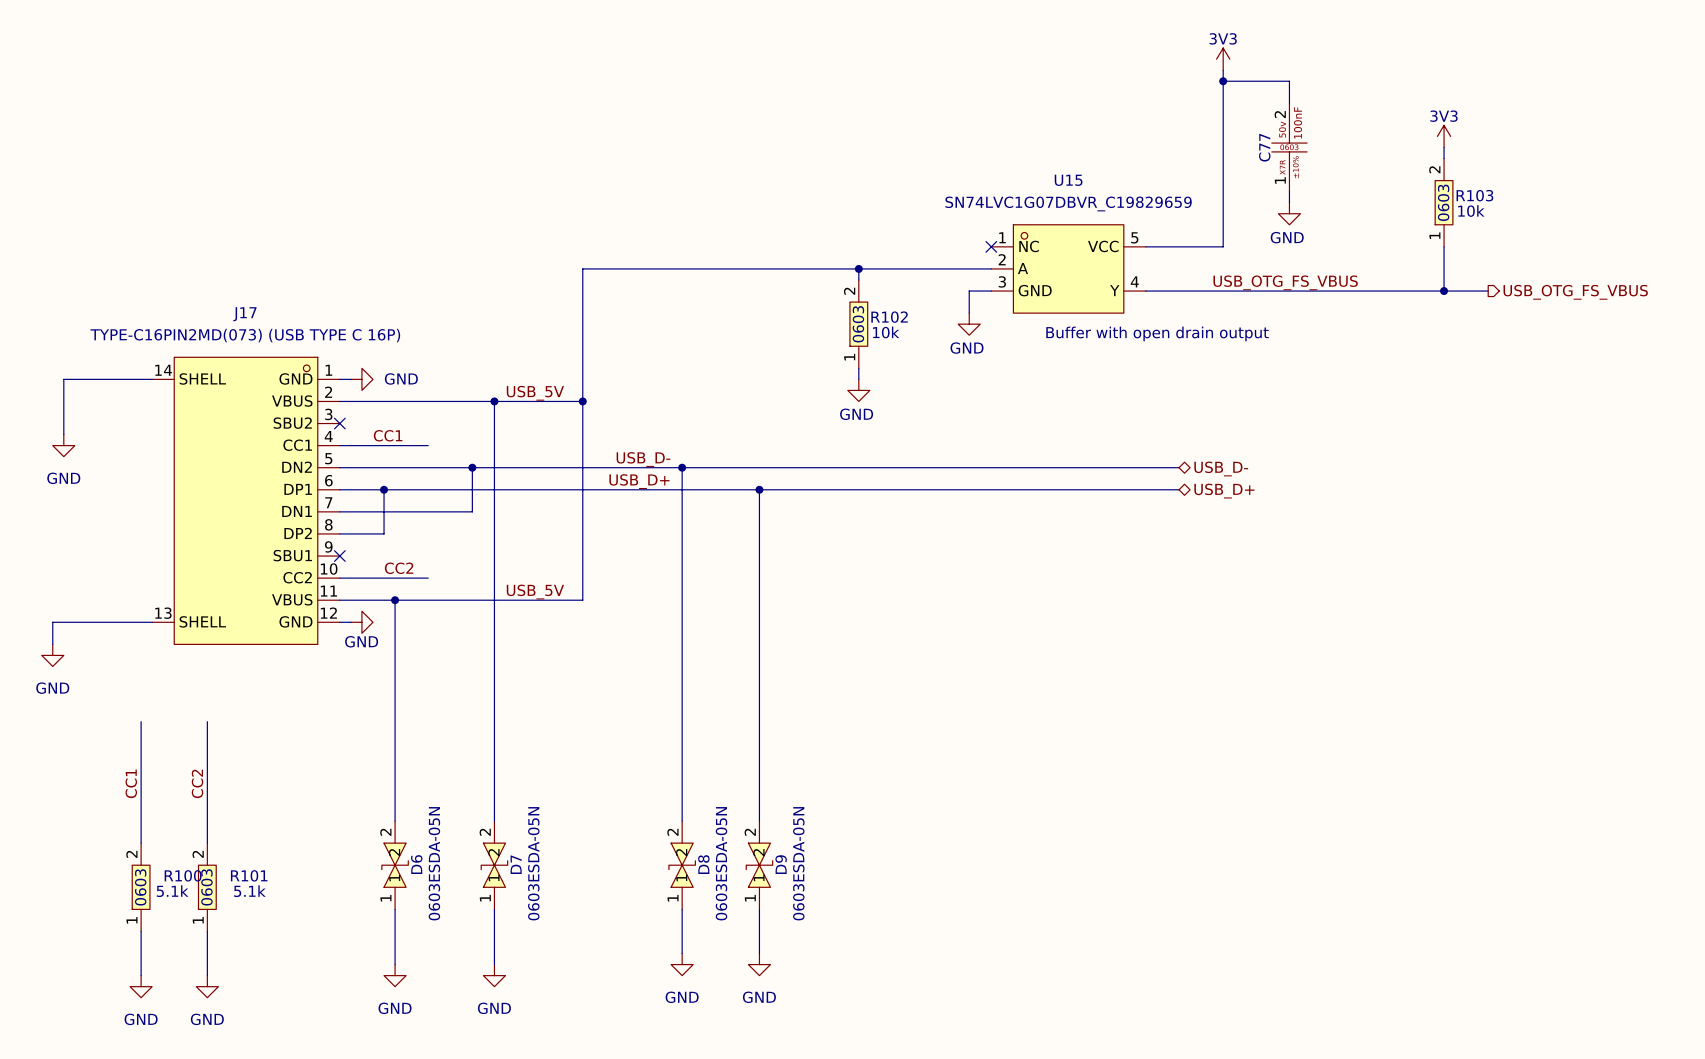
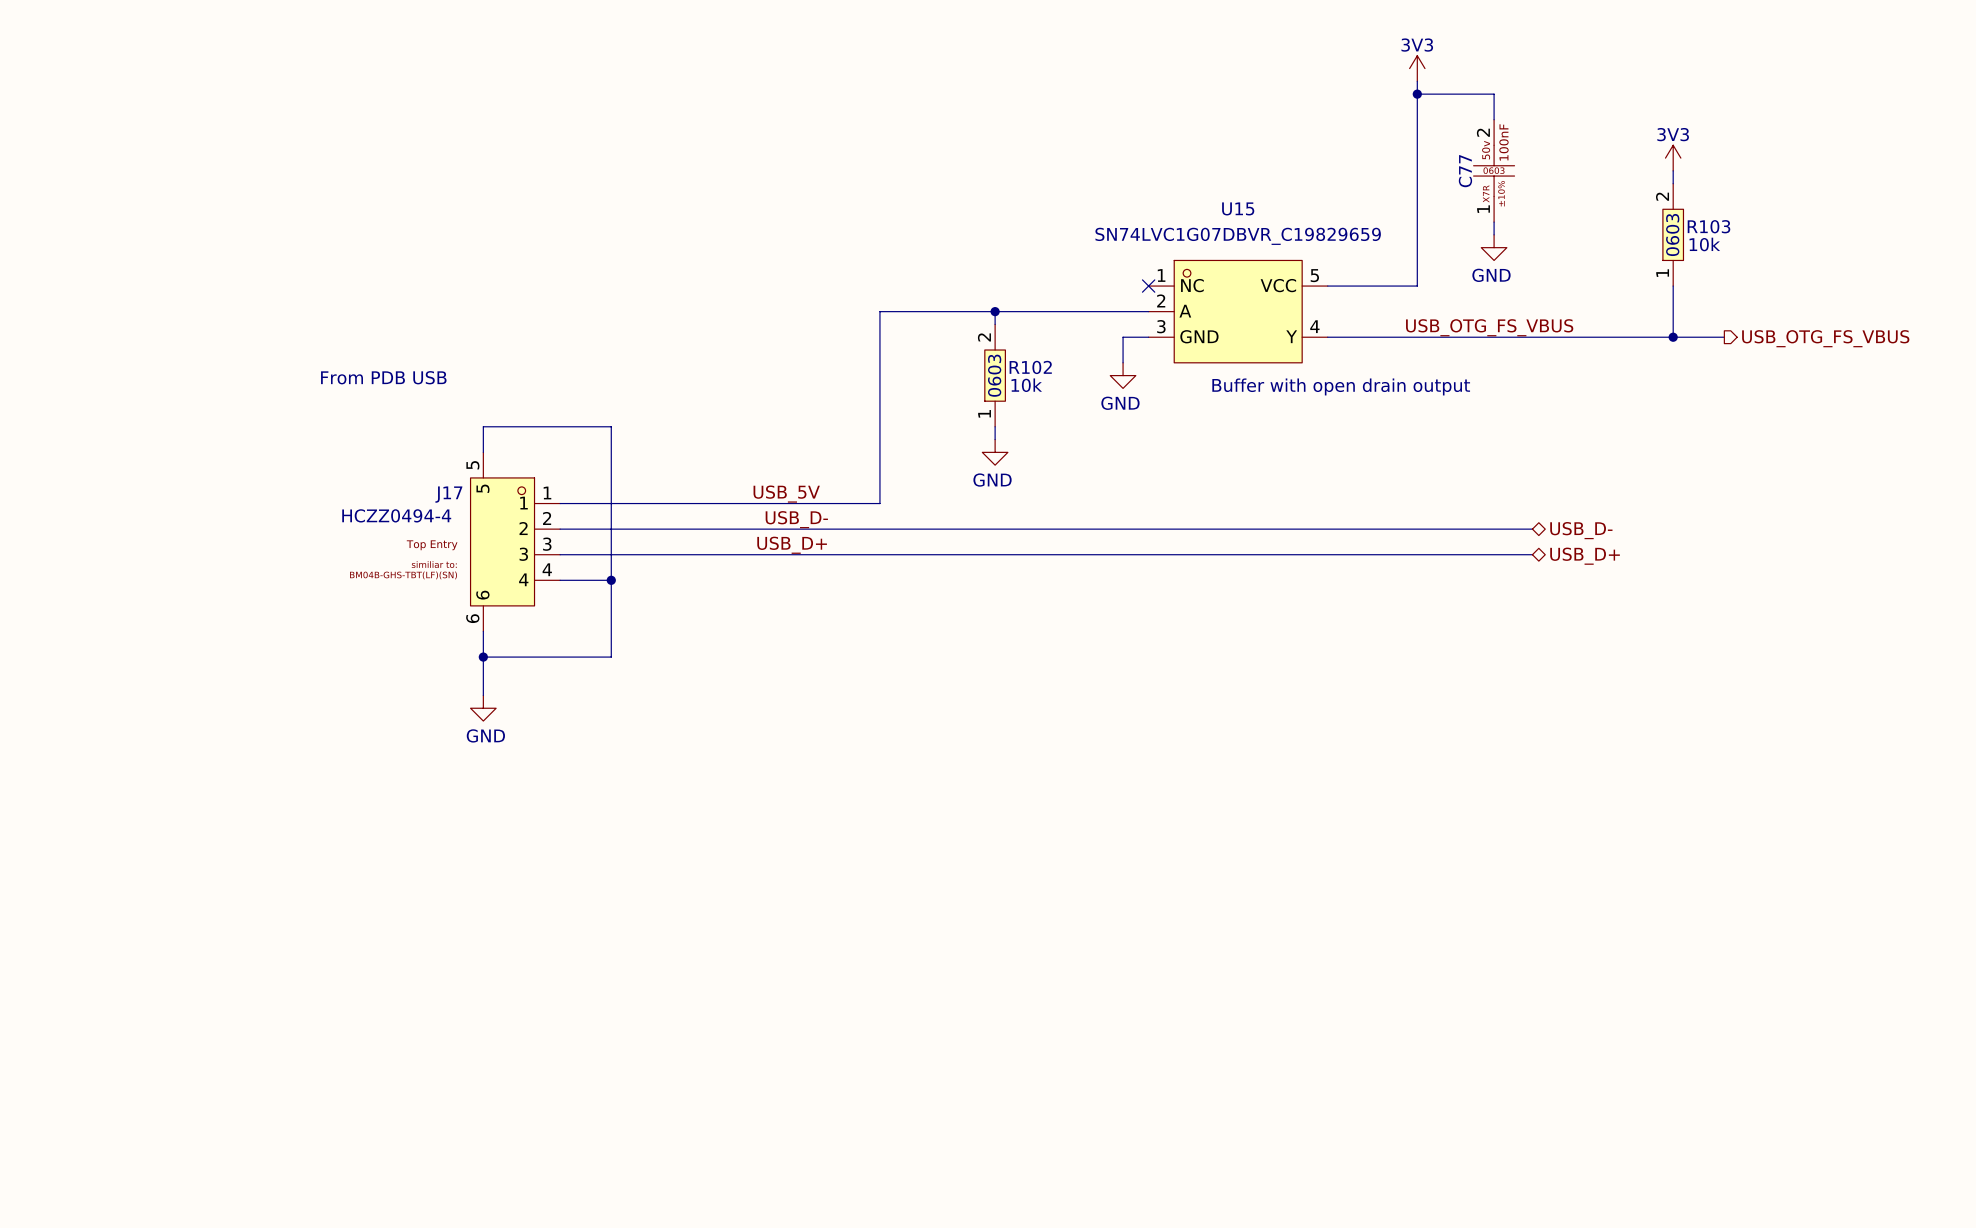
wire: (759, 268) (582, 268) (582, 600) (339, 600) -> (879, 311) (879, 503) (560, 503)
J17 name position: J17 (244, 314) -> J17 (448, 494)
text: none -> From PDB USB (383, 377)
J17 value: TYPE-C16PIN2MD(073) (USB TYPE C 16P) (245, 335) -> HCZZ0494-4 (396, 515)
J17 symbol: [152, 357, 340, 645] -> [470, 452, 561, 632]
wire: (152, 379) (63, 379) (63, 434) -> none
wire: (339, 379) (350, 379) -> none
power symbol: GND (361, 379) -> none
wire: none -> (483, 452) (483, 426) (611, 426) (611, 657) (483, 657)
label: USB_5V (535, 393) -> none
wire: (339, 401) (582, 401) -> none
wire: (494, 401) (494, 821) -> none
junction: (494, 401) -> none
junction: (582, 401) -> none
no-connect mark: (339, 423) -> none
label: none -> USB_5V (786, 494)
label: CC1 (388, 435) -> none
power symbol: GND (63, 445) -> none
wire: (339, 445) (428, 445) -> none
label position: USB_D- (643, 459) -> USB_D- (796, 519)
wire: (339, 467) (1179, 467) -> (560, 529) (1532, 529)
wire: (472, 467) (472, 511) (339, 511) -> none
junction: (472, 467) -> none
wire: (682, 467) (682, 821) -> none
junction: (682, 467) -> none
hierarchical label position: USB_D- (1221, 468) -> USB_D- (1581, 530)
label position: USB_D+ (639, 481) -> USB_D+ (792, 545)
wire: (339, 489) (1179, 489) -> (560, 554) (1532, 554)
wire: (384, 489) (384, 533) (339, 533) -> none
junction: (384, 489) -> none
wire: (759, 489) (759, 821) -> none
junction: (759, 489) -> none
hierarchical label position: USB_D+ (1224, 491) -> USB_D+ (1585, 556)
wire: none -> (560, 580) (611, 580)
junction: none -> (611, 580)
wire: none -> (483, 631) (483, 695)
no-connect mark: (339, 556) -> none
label: CC2 (399, 568) -> none
wire: (339, 578) (428, 578) -> none
label: USB_5V (535, 592) -> none
wire: (395, 600) (395, 821) -> none
junction position: (395, 600) -> (483, 657)
wire: (152, 622) (52, 622) (52, 644) -> none
wire: (339, 622) (350, 622) -> none
power symbol rotation: 0° (361, 622) -> 90° clockwise (483, 708)
power symbol position: GND (361, 622) -> GND (483, 708)
power symbol: GND (52, 655) -> none
wire: (141, 721) (141, 843) -> none
wire: (207, 721) (207, 843) -> none
label: CC1 (131, 783) -> none
label: CC2 (197, 783) -> none
D6: 0603ESDA-05N (395, 865) -> none
D7: 0603ESDA-05N (494, 865) -> none
D8: 0603ESDA-05N (682, 865) -> none
D9: 0603ESDA-05N (759, 865) -> none
R100: (141, 887) -> none
R101: (207, 887) -> none
wire: (395, 909) (395, 964) -> none
wire: (494, 909) (494, 964) -> none
wire: (682, 909) (682, 953) -> none
wire: (759, 909) (759, 953) -> none
wire: (141, 931) (141, 975) -> none
wire: (207, 931) (207, 975) -> none
power symbol: GND (682, 964) -> none
power symbol: GND (759, 964) -> none
power symbol: GND (395, 975) -> none
power symbol: GND (494, 975) -> none
power symbol: GND (141, 986) -> none
power symbol: GND (207, 986) -> none

